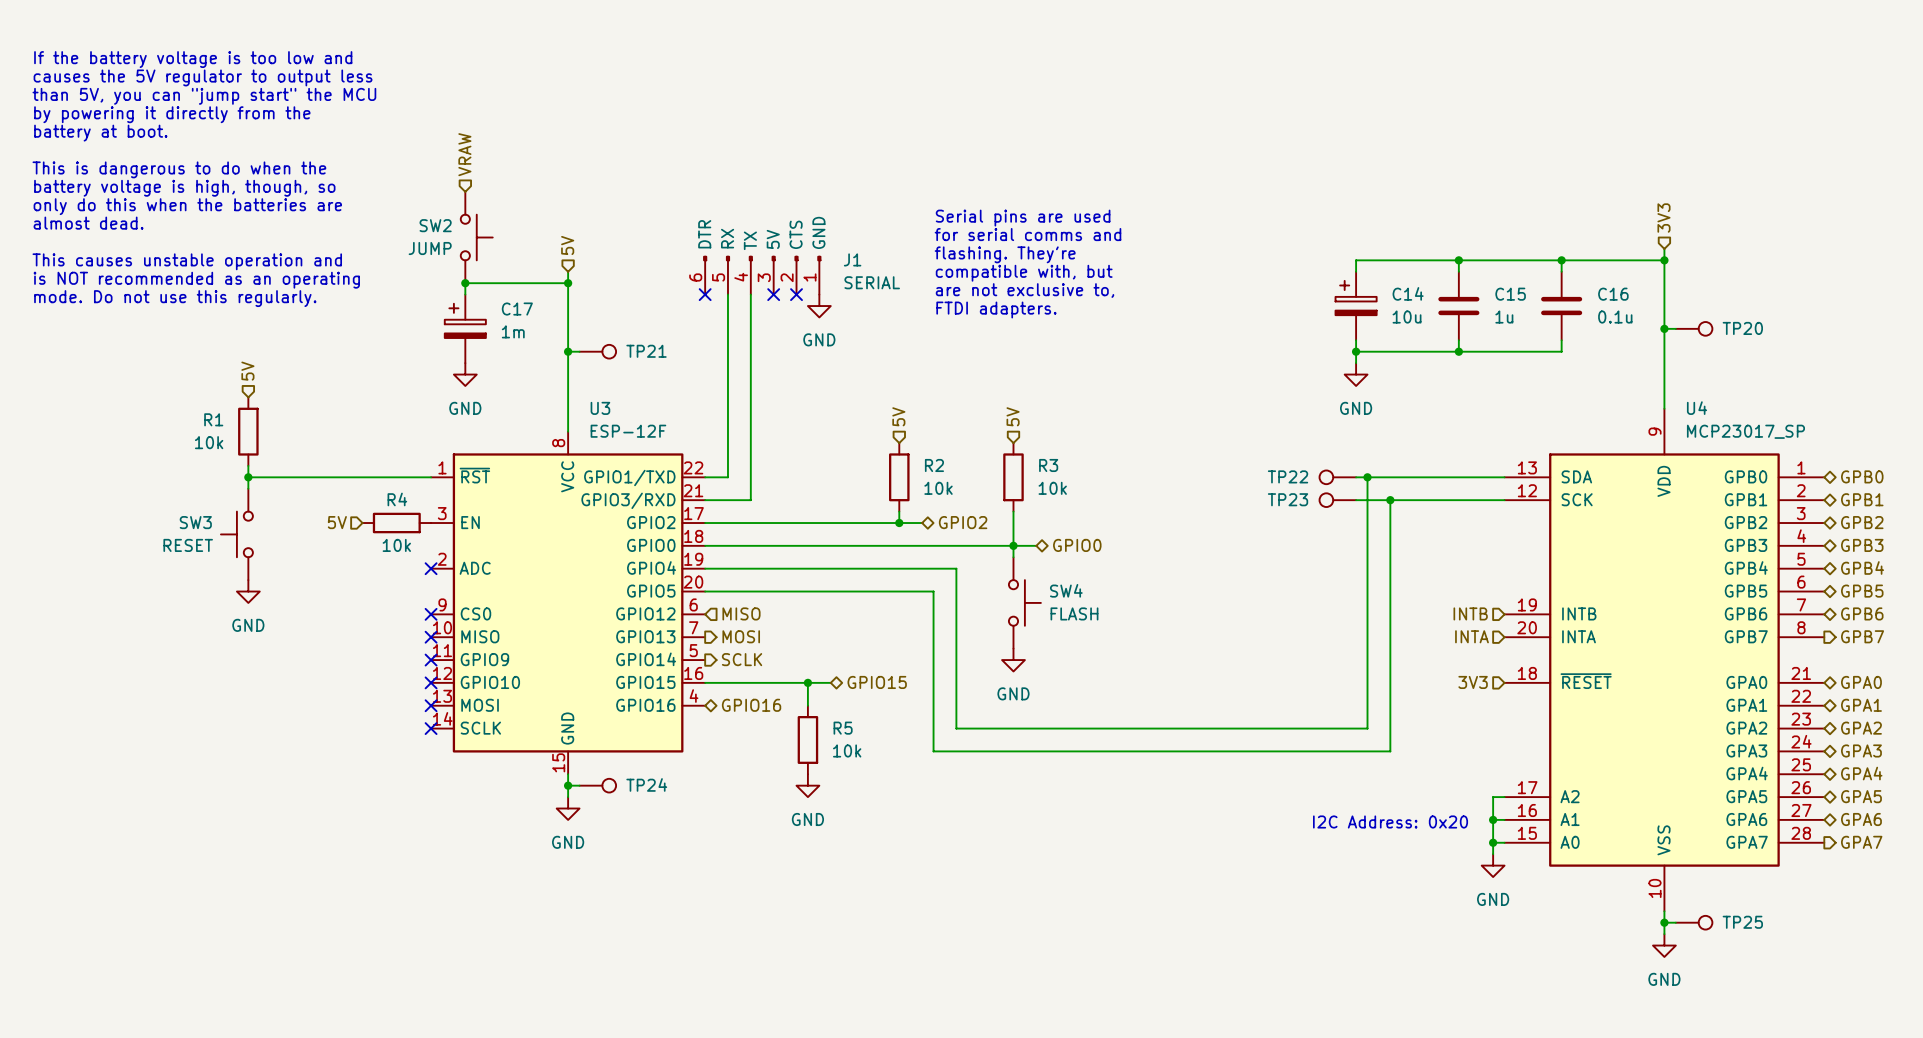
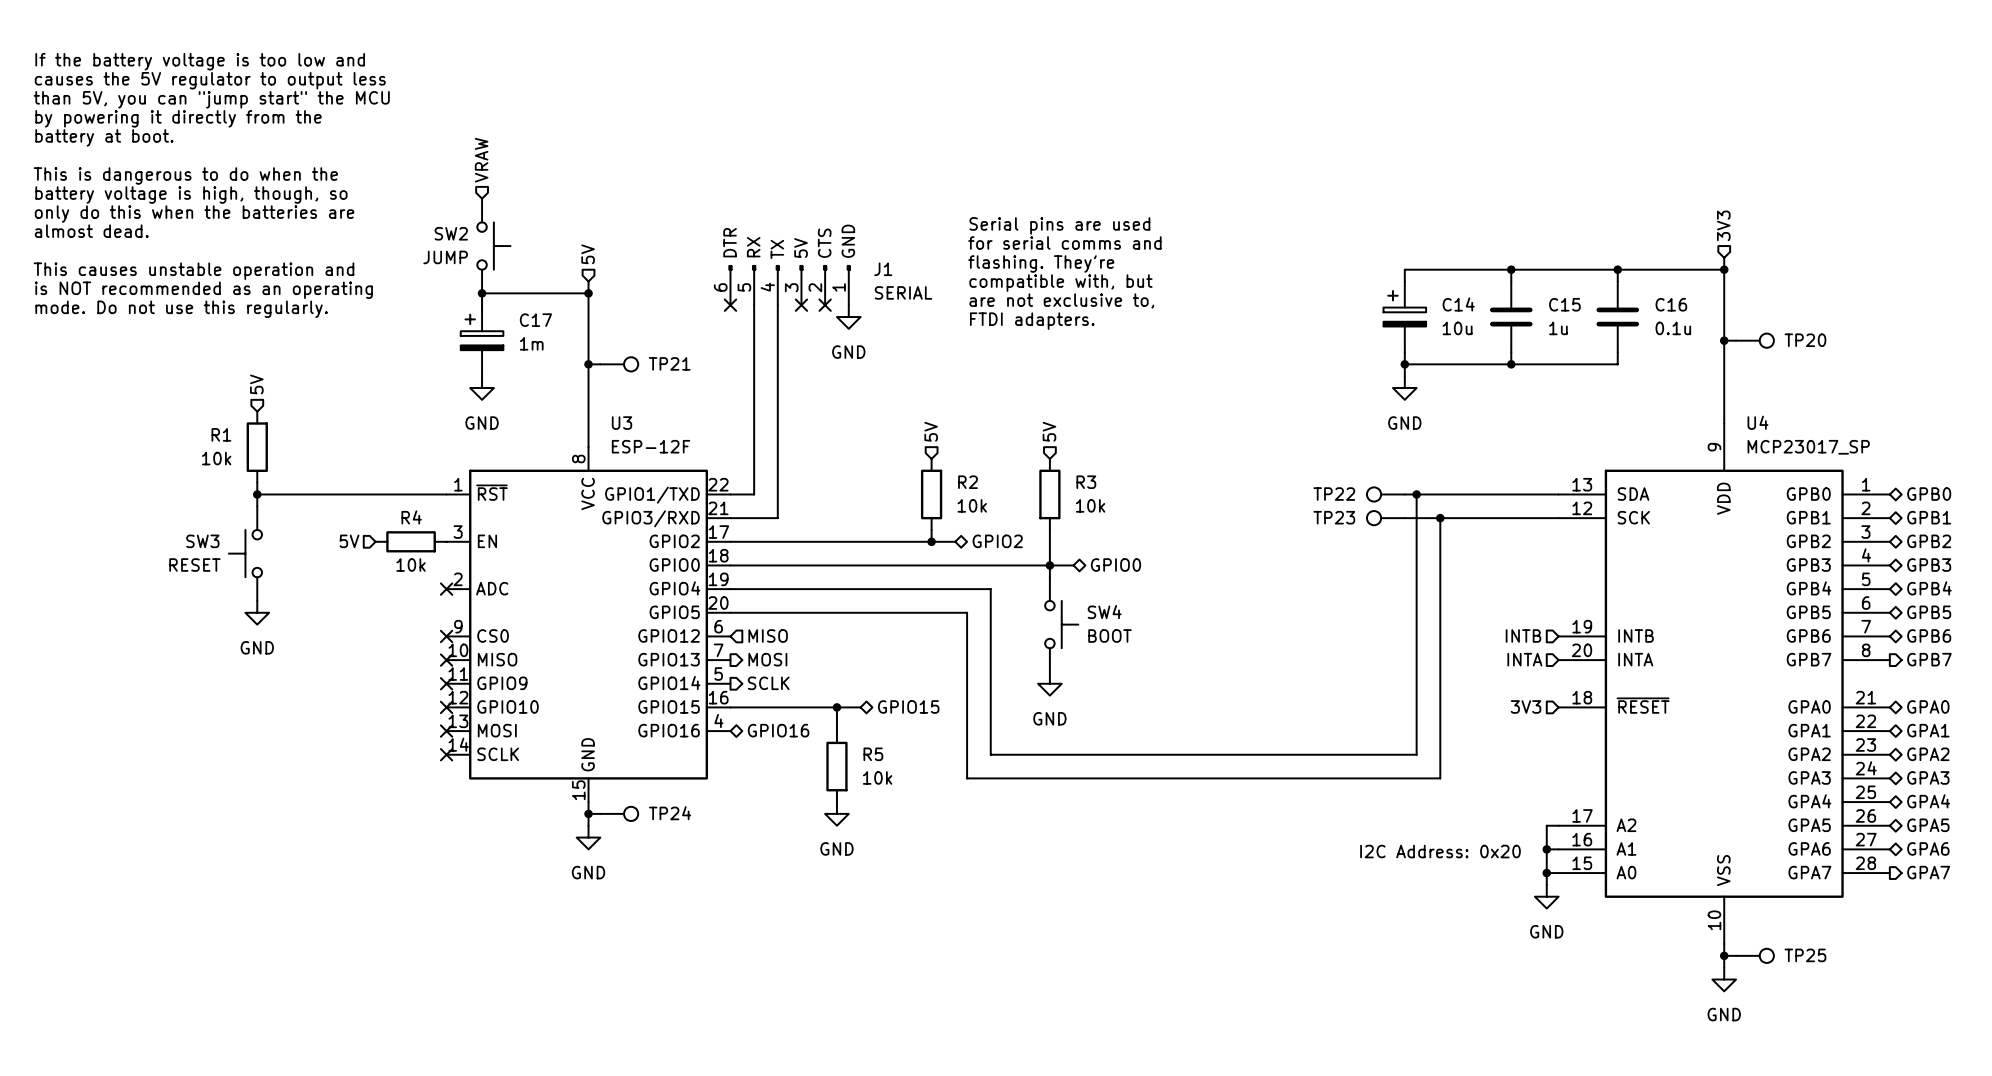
SW4 value: FLASH (1074, 613) -> BOOT (1109, 636)

